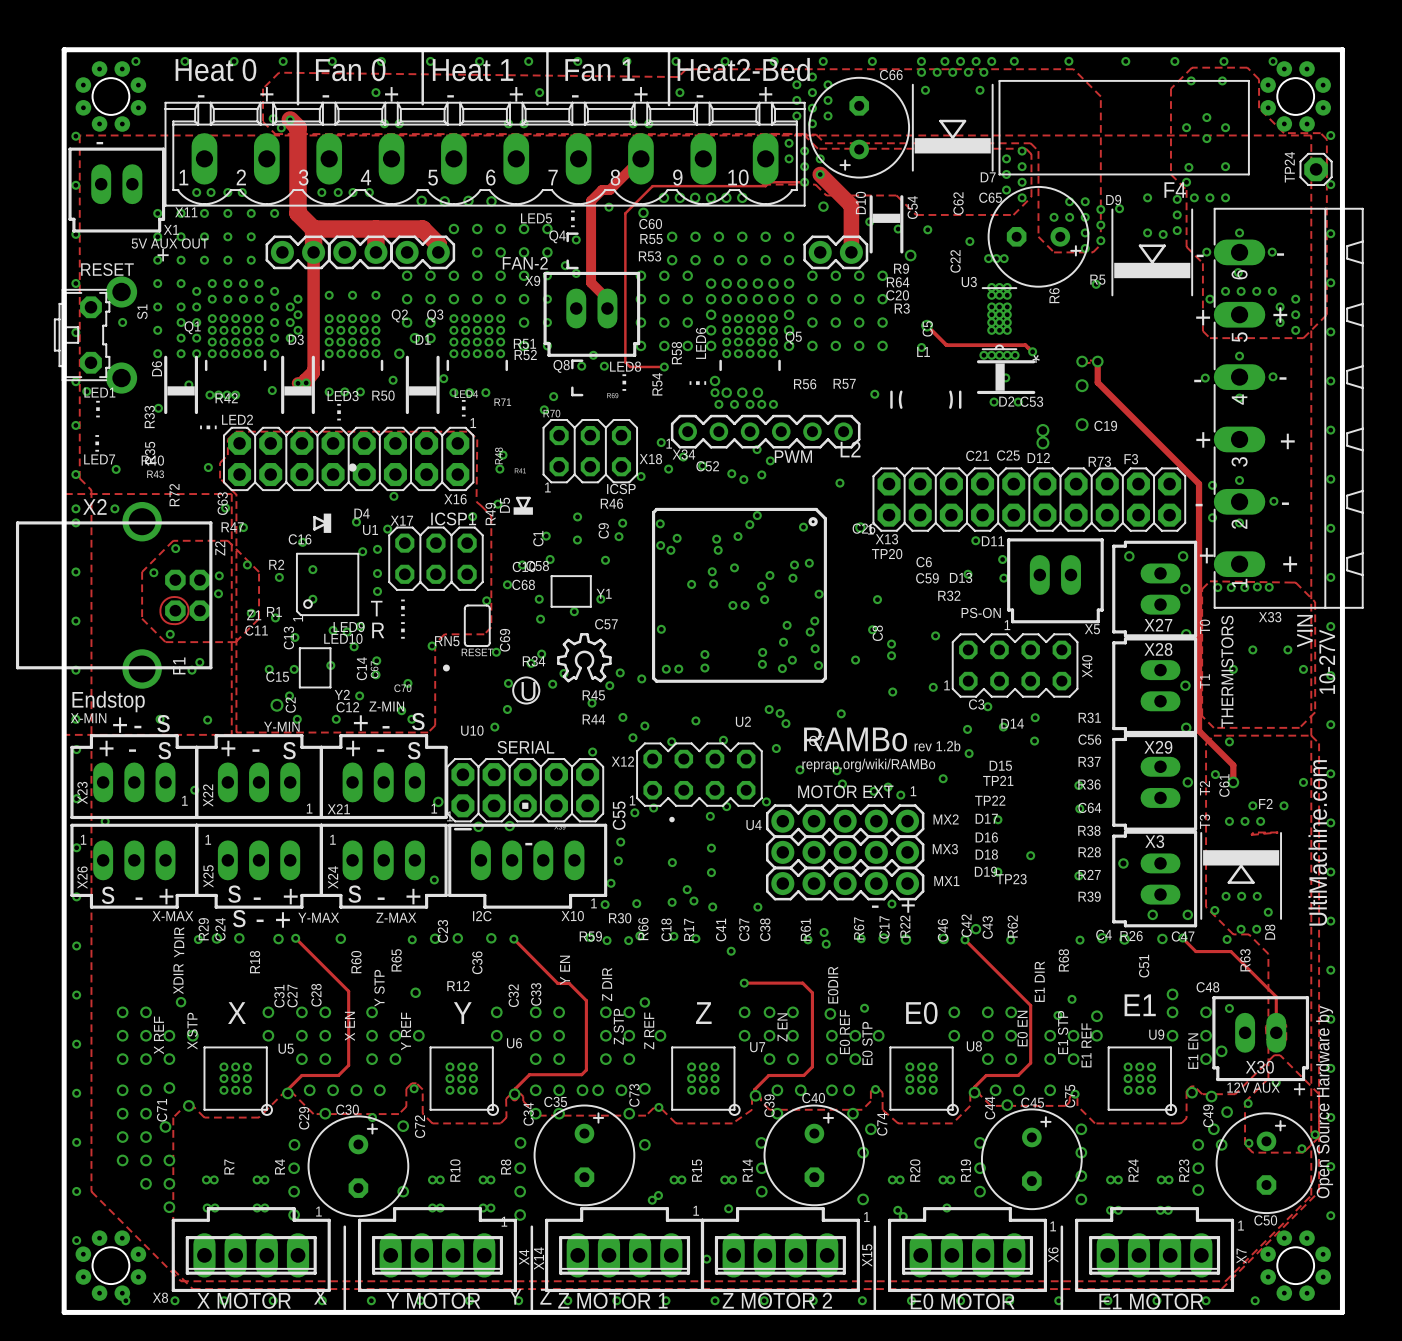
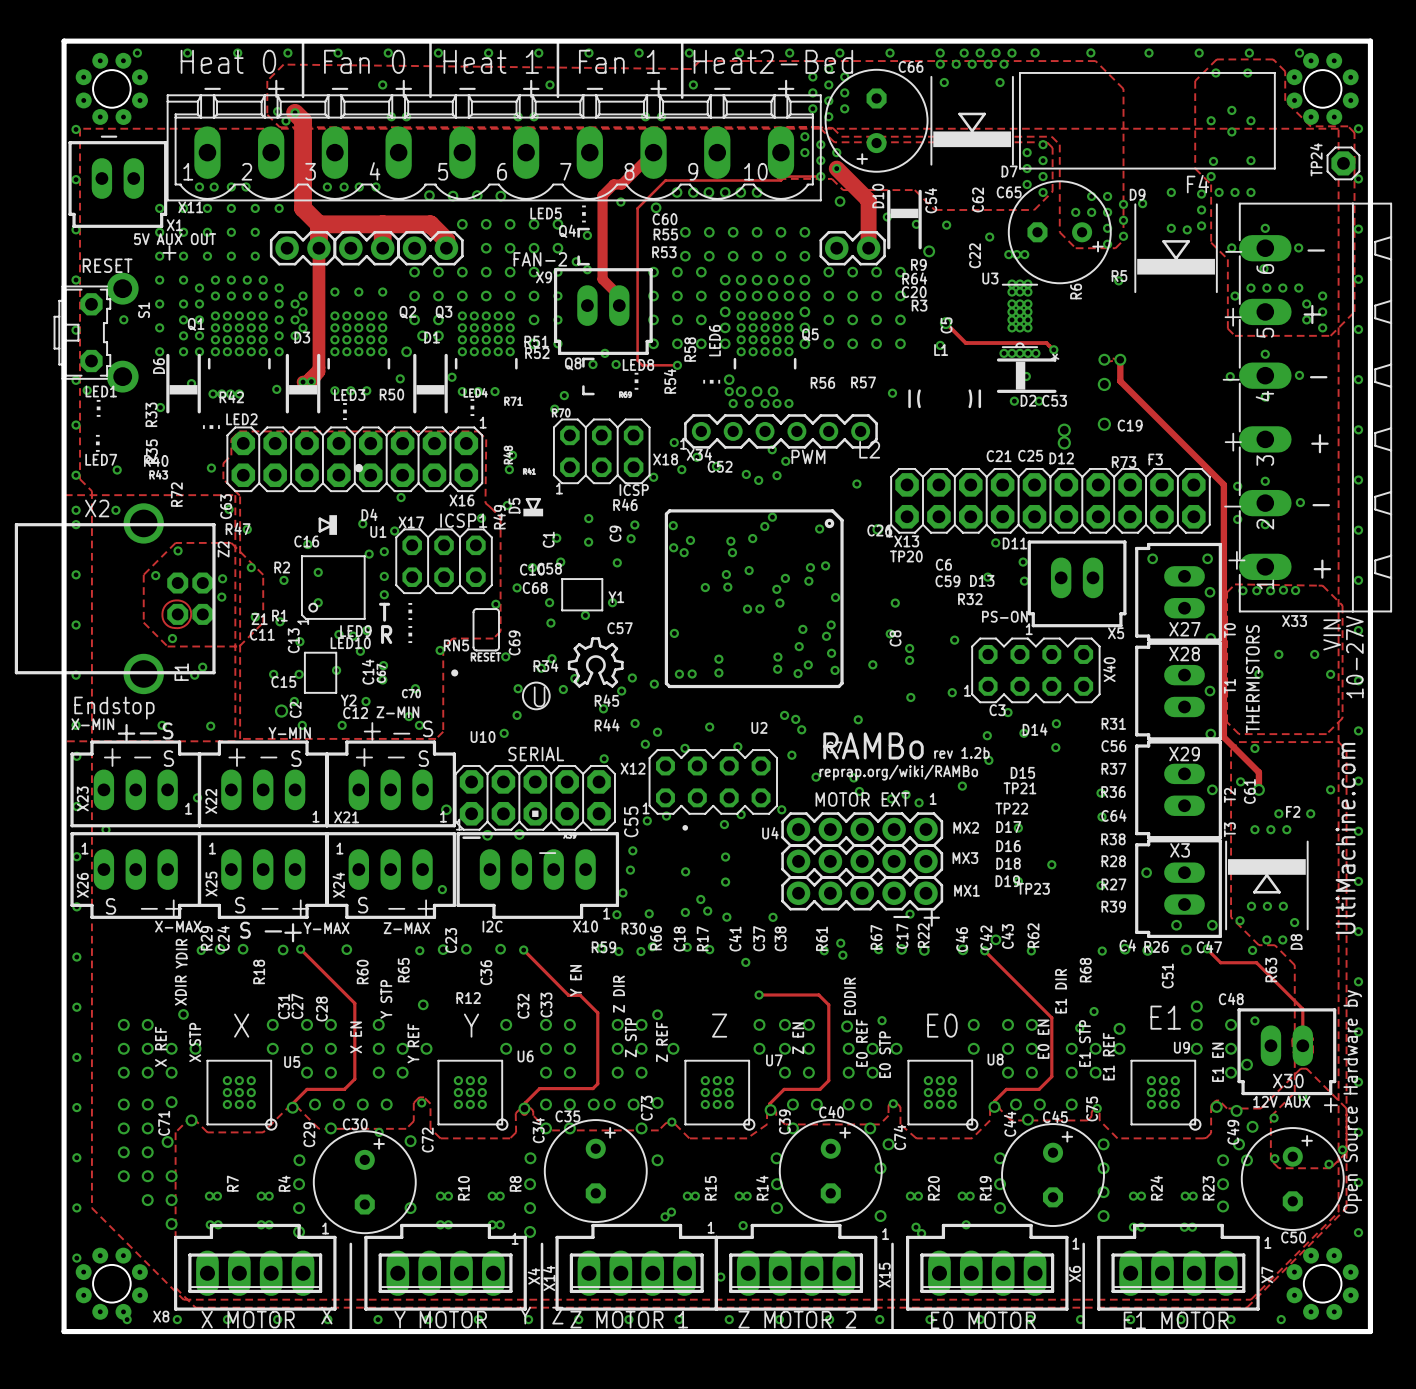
zone outline: (1253, 832) (1251, 834) (1278, 832) (1253, 832) -> none

